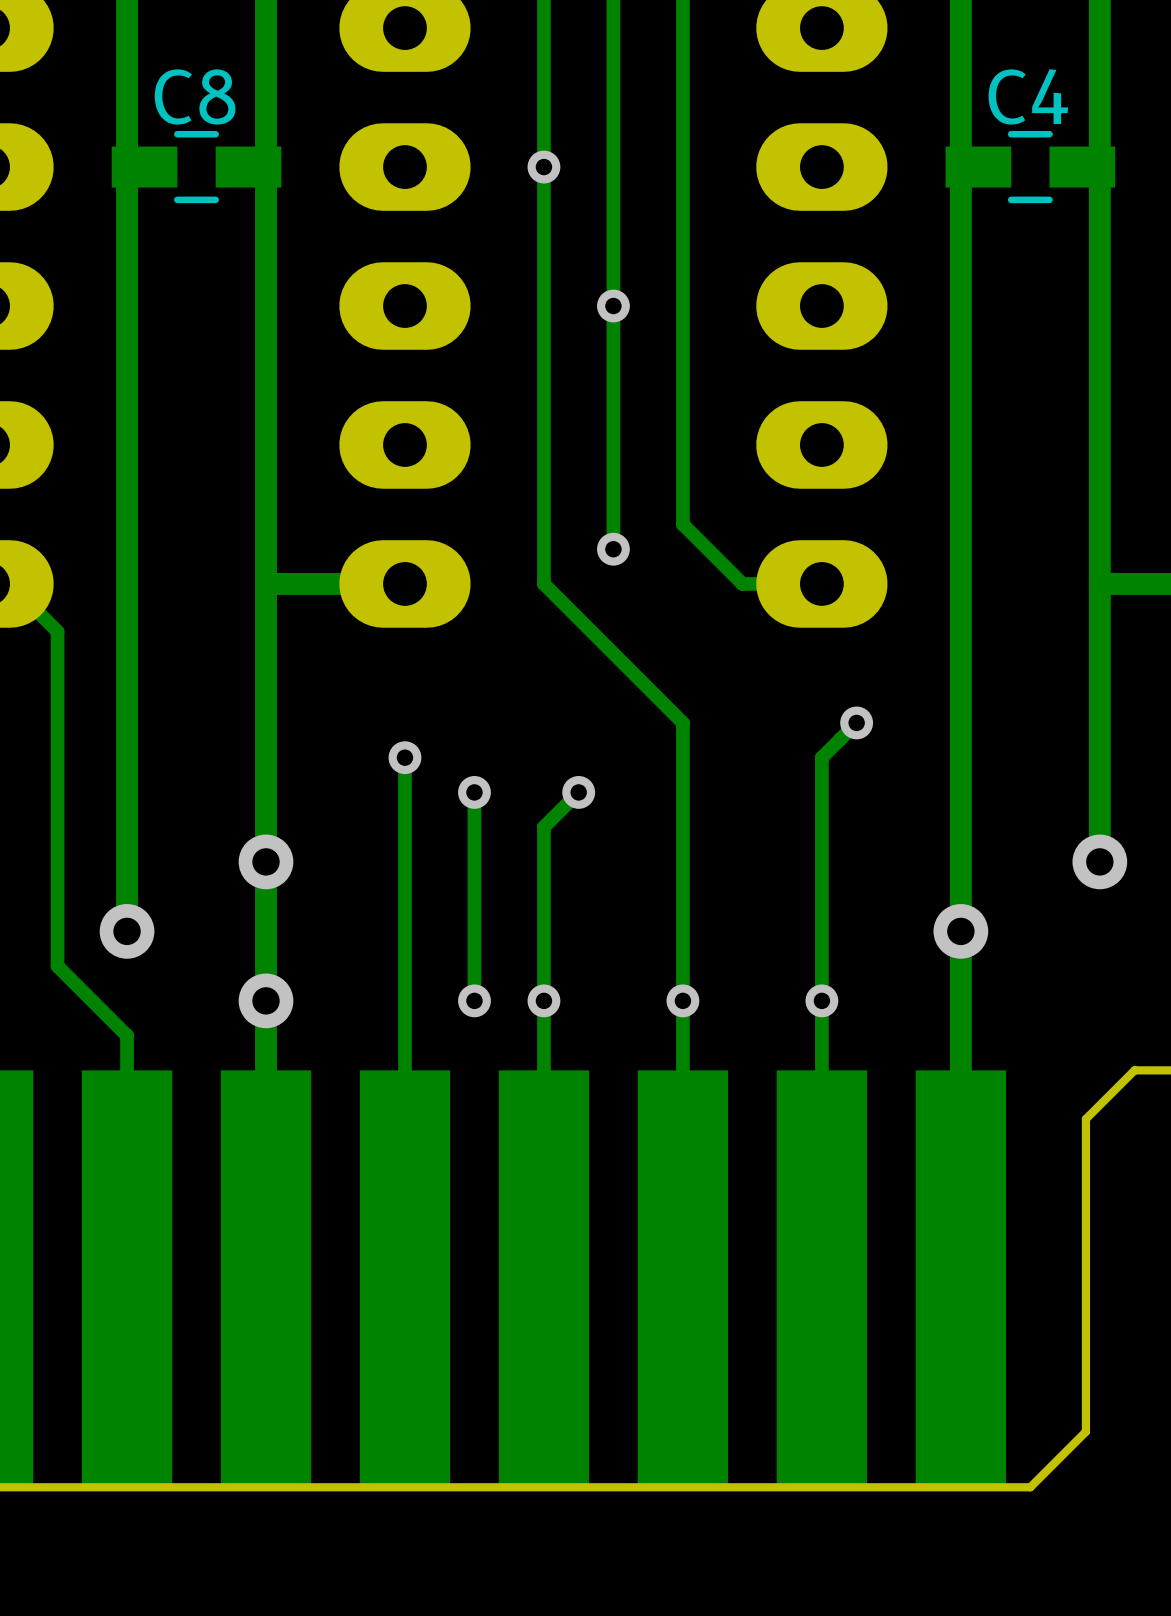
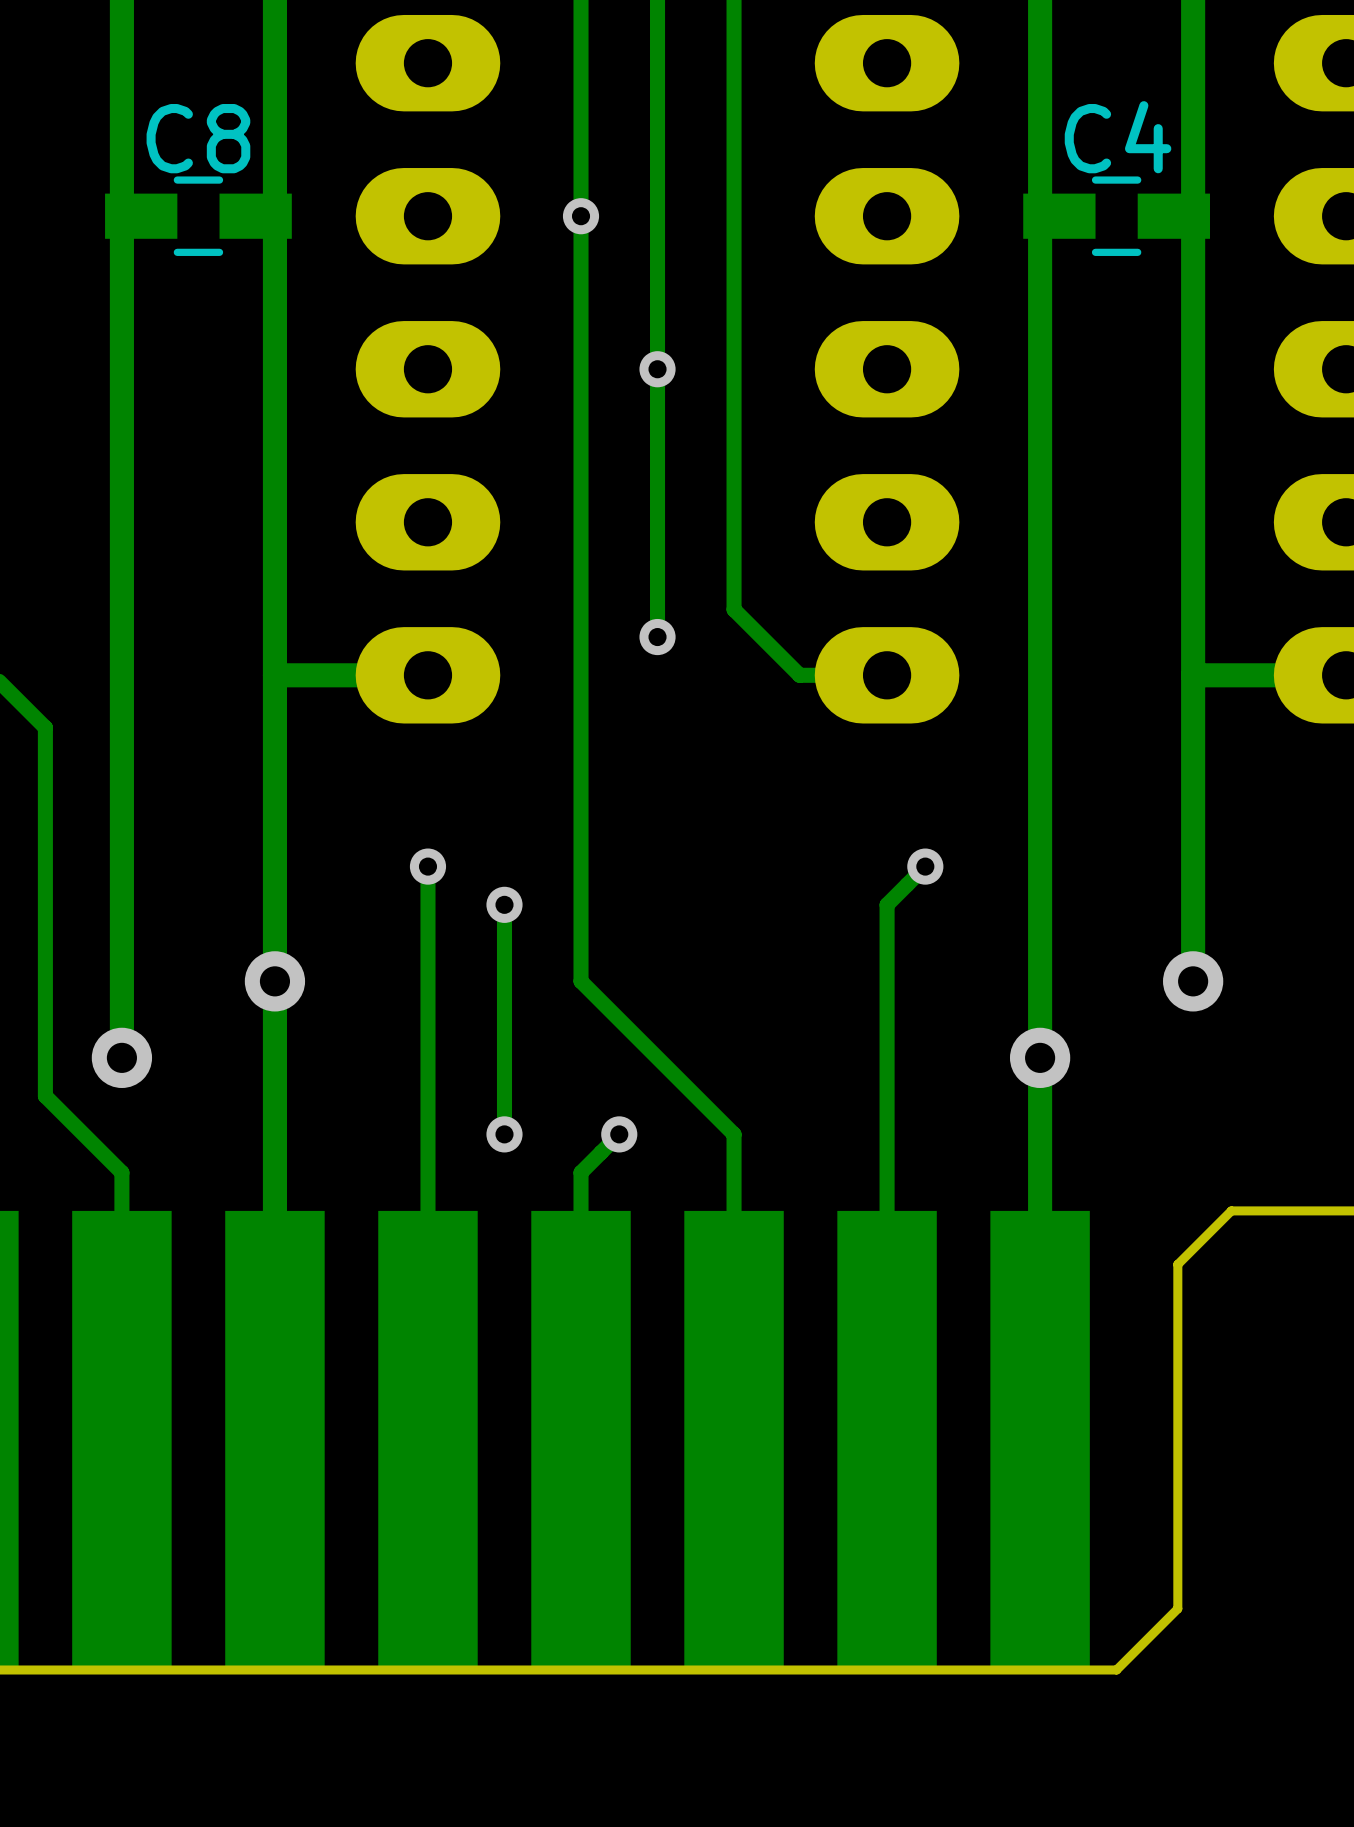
track: (543, 583) (682, 722) (682, 1000) -> none
track: (856, 722) (821, 757) (821, 792) -> (925, 866) (887, 904)
via position: (856, 722) -> (925, 866)
track: (578, 792) (543, 827) -> (581, 675) (581, 943)
via: (578, 792) -> none
track: (543, 861) (543, 1035) -> (581, 981) (734, 1134)
via: (266, 1000) -> none
via position: (543, 1000) -> (619, 1134)
track: none -> (619, 1134) (581, 1172)
via: (682, 1000) -> none
via: (821, 1000) -> none

